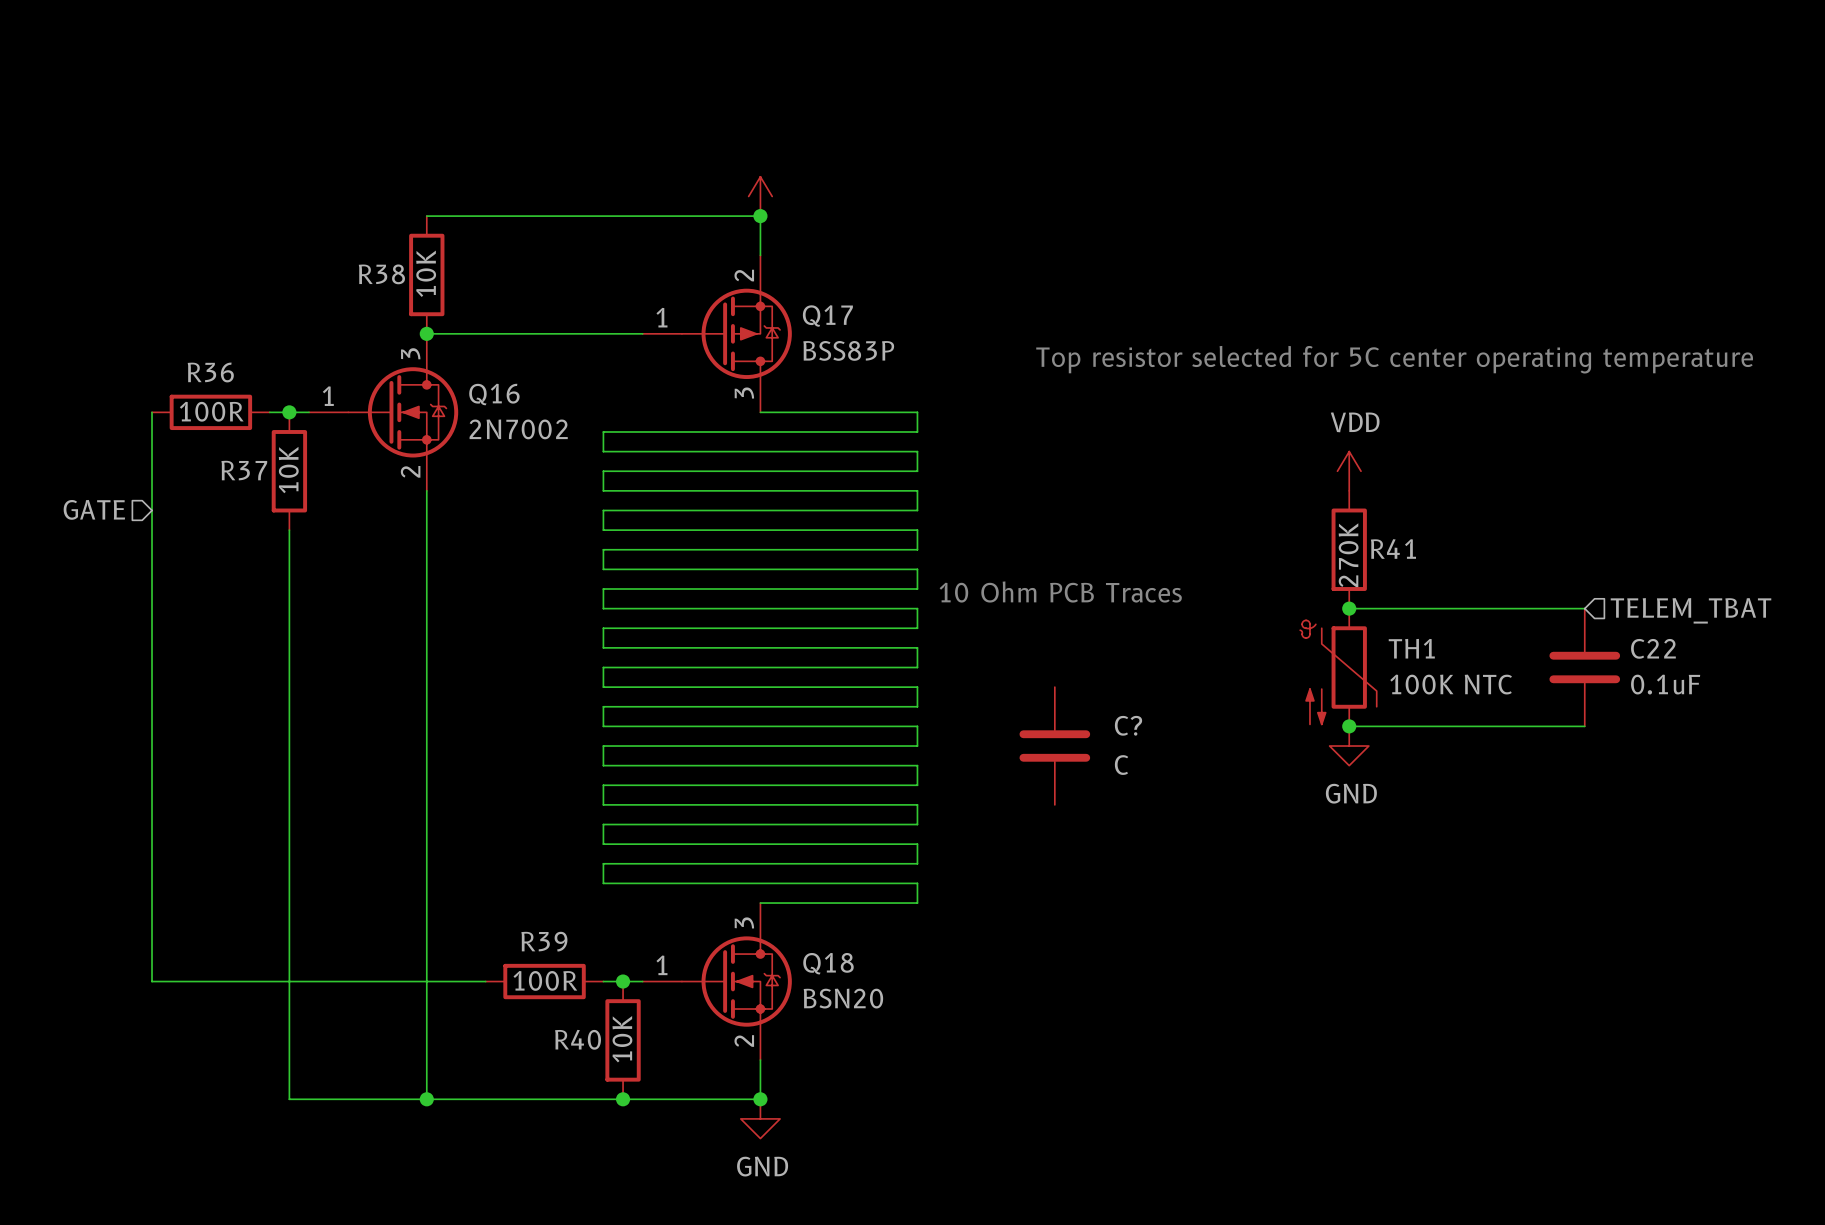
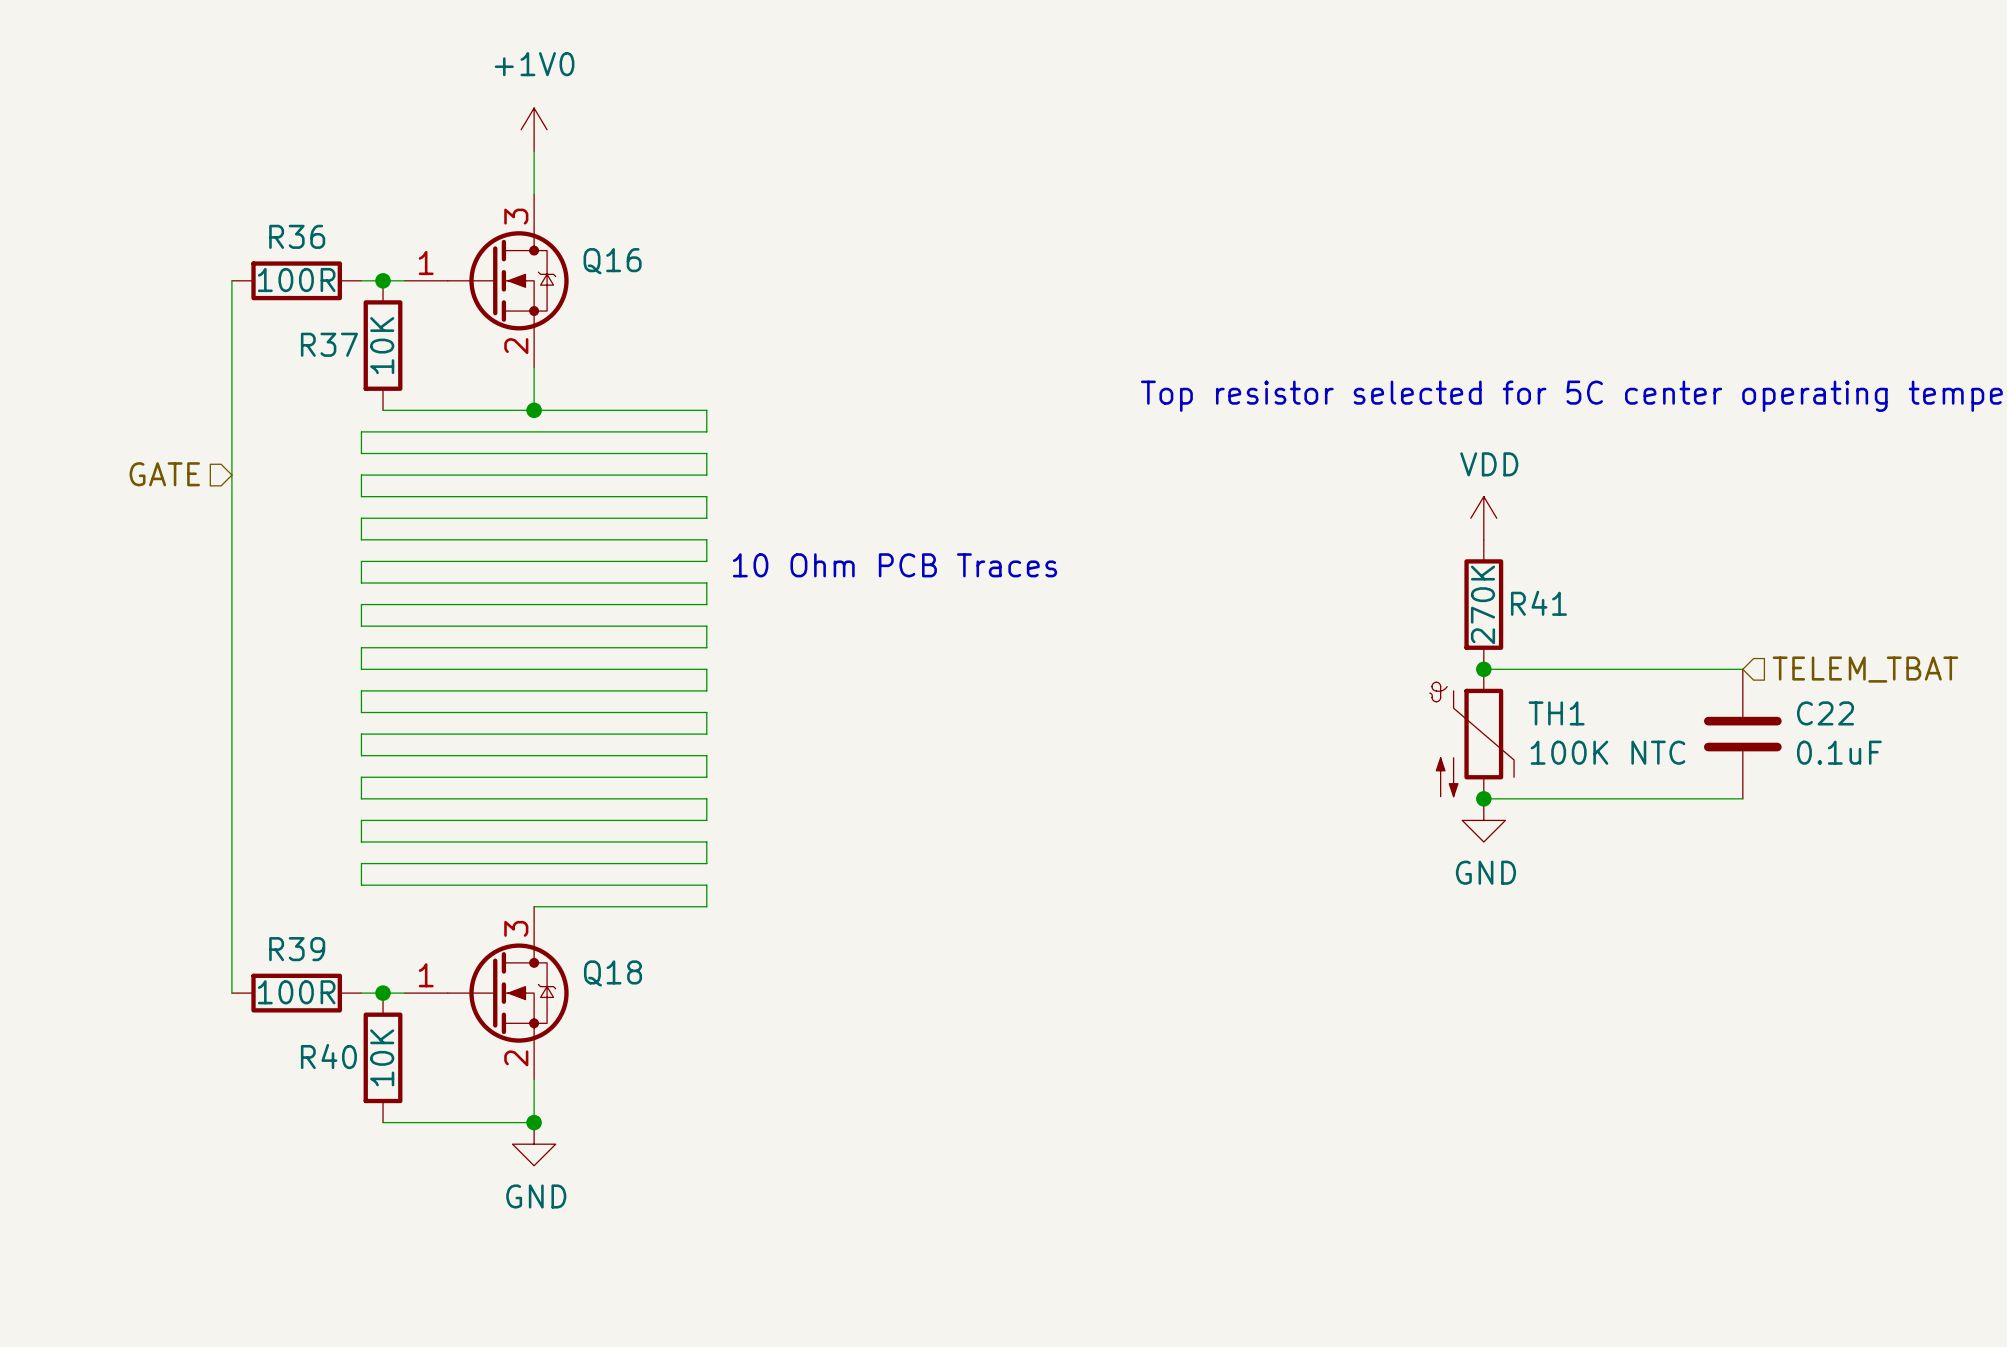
power symbol: none -> +1V0 (534, 129)
wire: none -> (534, 151) (534, 194)
power symbol: (760, 196) -> none
wire: (426, 216) (760, 216) (760, 255) -> none
junction: (760, 216) -> none
wire: none -> (231, 280) (231, 993)
junction: none -> (383, 280)
R38: 10K (426, 274) -> none
wire: (426, 333) (642, 333) -> none
junction: (426, 333) -> none
wire: none -> (534, 367) (534, 410)
Q17: BSS83P (717, 333) -> none
junction: none -> (534, 410)
wire: (152, 412) (152, 981) (485, 981) -> (383, 1122) (534, 1122) (534, 1079)
R36 position: (210, 412) -> (296, 280)
wire: (269, 412) (309, 412) -> (361, 280) (404, 280)
junction: (289, 412) -> none
Q16 position: (383, 412) -> (486, 280)
wire: (760, 412) (917, 412) (917, 431) (642, 431) -> (383, 410) (706, 410) (706, 431) (361, 431) (361, 453) (706, 453) (706, 475)
Q16 value: 2N7002 (518, 429) -> none
wire: (603, 431) (603, 451) -> (663, 475) (361, 475) (361, 496) (663, 496)
wire: (642, 451) (917, 451) (917, 471) (642, 471) -> (706, 496) (706, 518)
R37 position: (289, 471) -> (383, 345)
wire: (603, 471) (603, 490) -> (663, 518) (361, 518) (361, 539) (663, 539)
wire: (426, 490) (426, 1099) -> none
wire: (642, 490) (917, 490) (917, 510) (642, 510) -> (706, 539) (706, 561)
hierarchical label position: GATE (94, 509) -> GATE (164, 474)
wire: (603, 510) (603, 530) -> (663, 561) (361, 561) (361, 582) (663, 582)
wire: (289, 530) (289, 1099) (760, 1099) (760, 1060) -> none
wire: (642, 530) (917, 530) (917, 549) (642, 549) -> (706, 582) (706, 604)
wire: (603, 549) (603, 569) -> (663, 604) (361, 604) (361, 626) (663, 626)
wire: (642, 569) (917, 569) (917, 589) (642, 589) -> (706, 626) (706, 647)
wire: (603, 589) (603, 608) -> (663, 647) (361, 647) (361, 669) (663, 669)
text position: 10 Ohm PCB Traces (1060, 592) -> 10 Ohm PCB Traces (895, 565)
wire: (642, 608) (917, 608) (917, 628) (642, 628) -> (706, 669) (706, 690)
wire: (603, 628) (603, 647) -> (663, 690) (361, 690) (361, 712) (663, 712)
wire: (642, 647) (917, 647) (917, 667) (642, 667) -> (706, 712) (706, 734)
wire: (603, 667) (603, 687) -> (663, 734) (361, 734) (361, 755) (663, 755)
wire: (642, 687) (917, 687) (917, 706) (642, 706) -> (706, 755) (706, 777)
wire: (603, 706) (603, 726) -> (663, 777) (361, 777) (361, 798) (663, 798)
wire: (642, 726) (917, 726) (917, 746) (642, 746) -> (706, 798) (706, 820)
wire: (603, 746) (603, 765) -> (663, 820) (361, 820) (361, 842) (663, 842)
C?: C (1054, 746) -> none
wire: (642, 765) (917, 765) (917, 785) (642, 785) -> (706, 842) (706, 863)
wire: (603, 785) (603, 804) -> (663, 863) (361, 863) (361, 885) (663, 885)
wire: (642, 804) (917, 804) (917, 824) (642, 824) -> (706, 885) (706, 906)
wire: (603, 824) (603, 844) (917, 844) (917, 863) (603, 863) (603, 883) (917, 883) (917, 903) (760, 903) -> (663, 906) (534, 906)
junction: none -> (383, 993)
R39 position: (544, 981) -> (296, 993)
wire: (603, 981) (642, 981) -> (361, 993) (404, 993)
junction: (623, 981) -> none
Q18 position: (717, 981) -> (486, 993)
Q18 value: BSN20 (843, 998) -> none
junction: none -> (534, 1122)
R40 position: (623, 1040) -> (383, 1057)
junction: (426, 1099) -> none
junction: (623, 1099) -> none
junction: (760, 1099) -> none
power symbol position: GND (760, 1118) -> GND (534, 1144)

